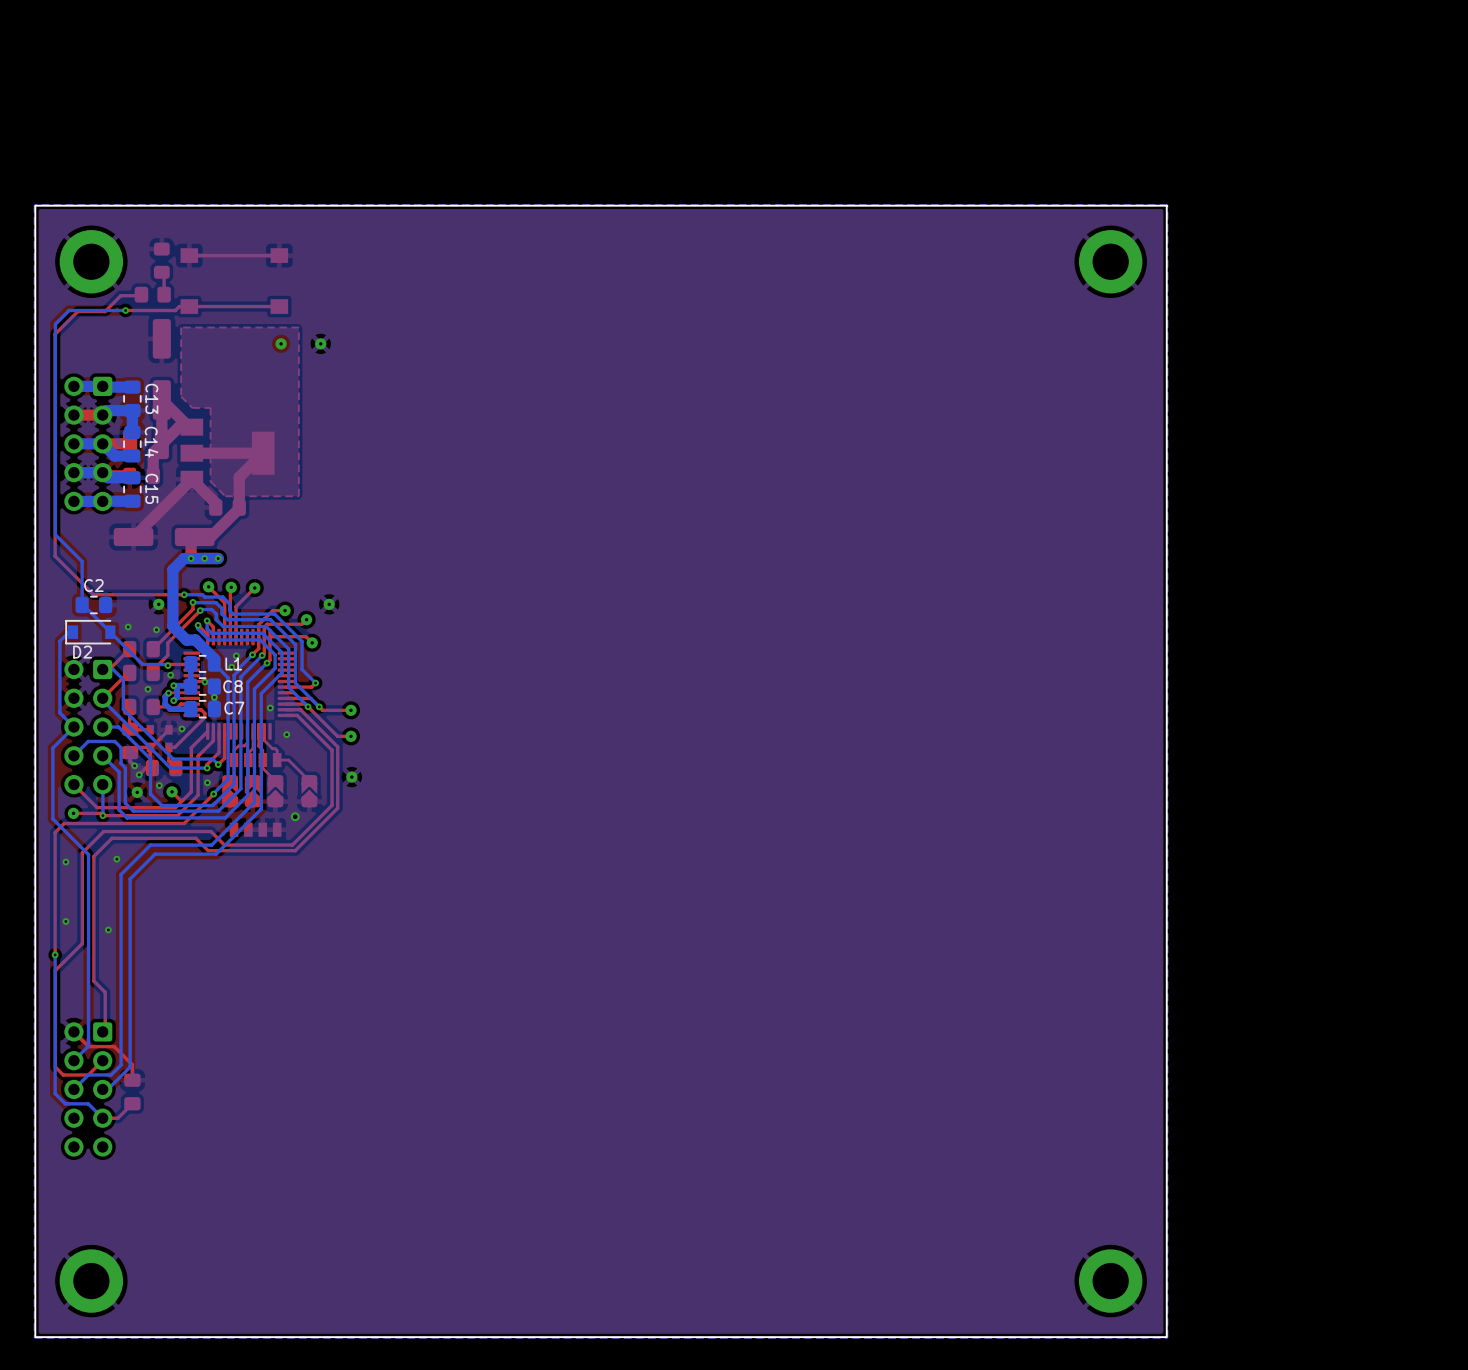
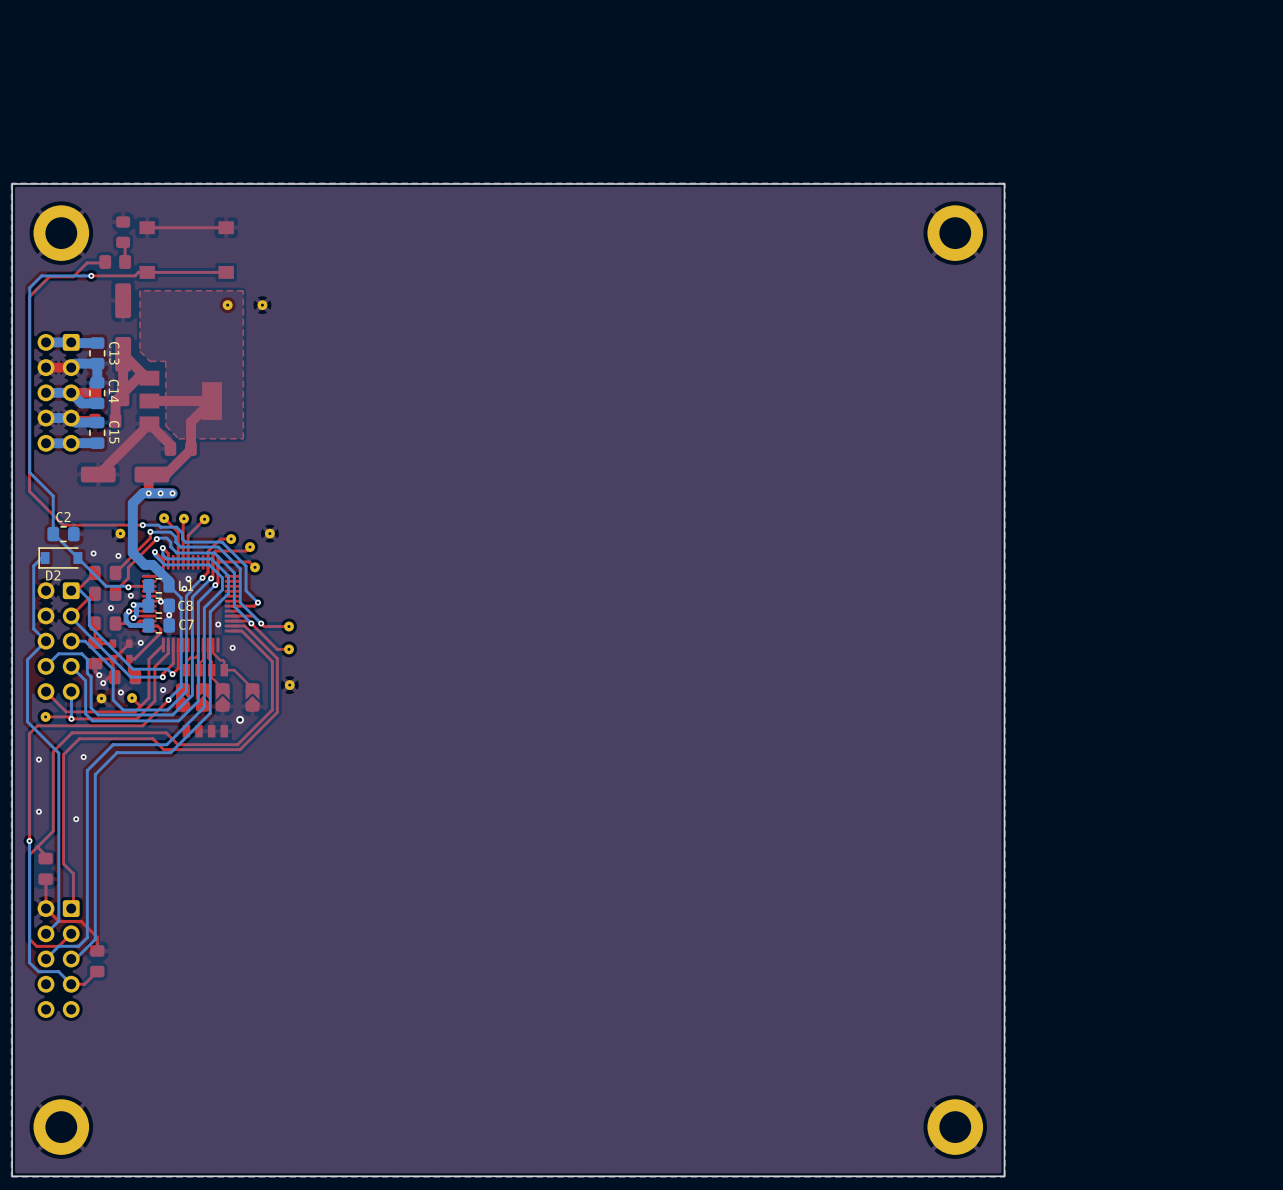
top track: none -> (37, 846) (45, 855) (45, 858)
part: none -> (45, 868)
top track: none -> (45, 879) (46, 908)

